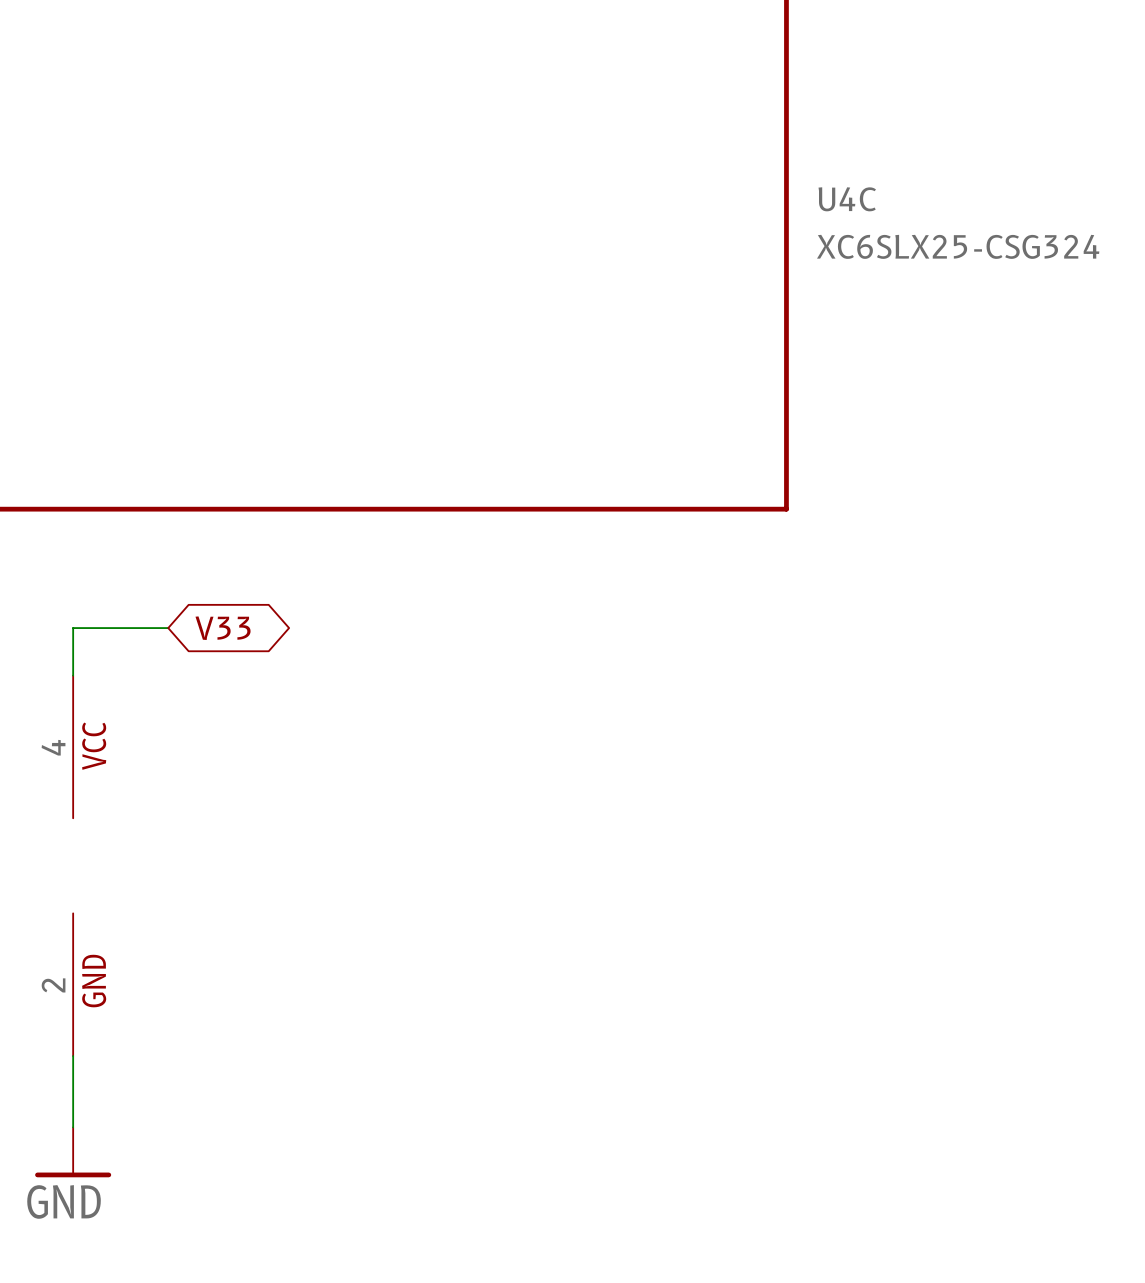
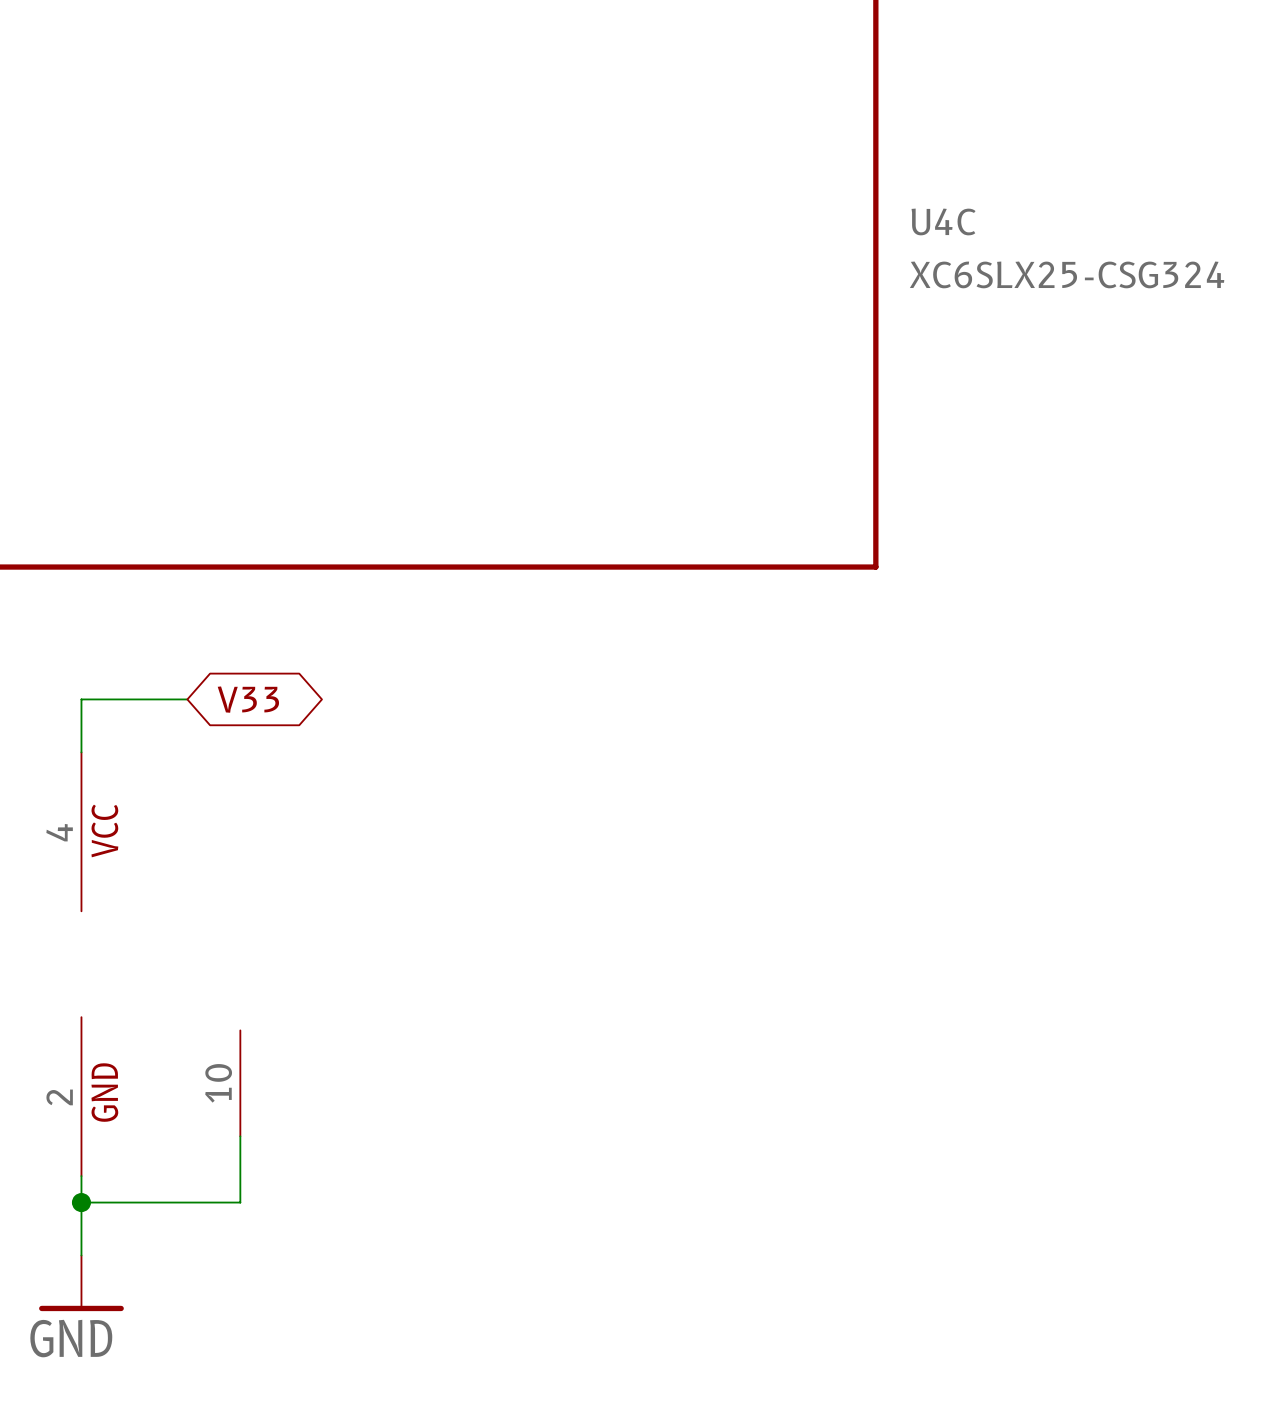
part: none -> (240, 1083)
wire: none -> (240, 1136) (240, 1202) (81, 1202)
junction: none -> (81, 1202)

